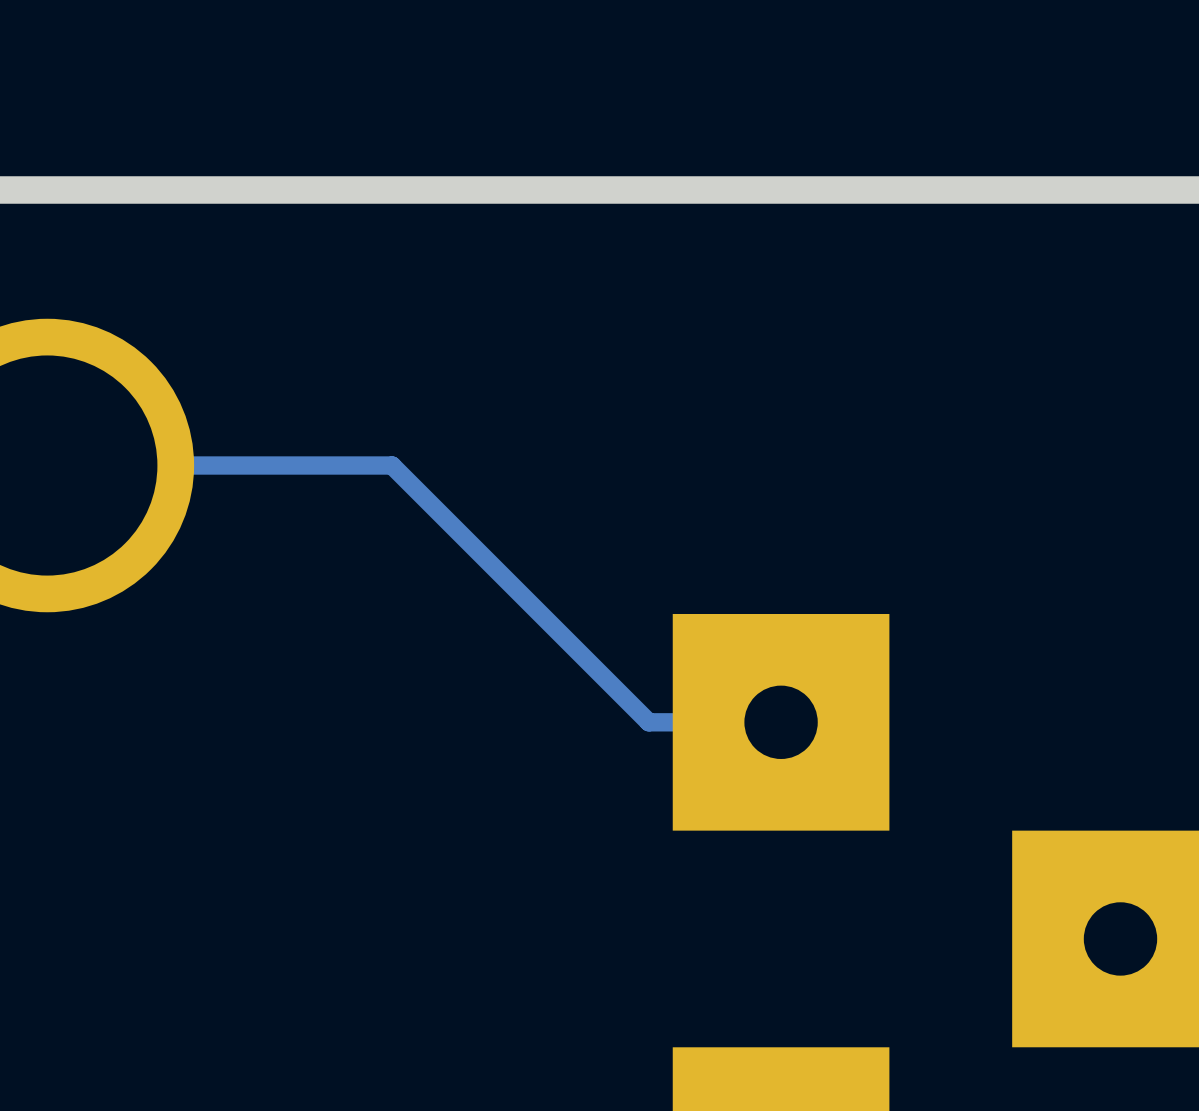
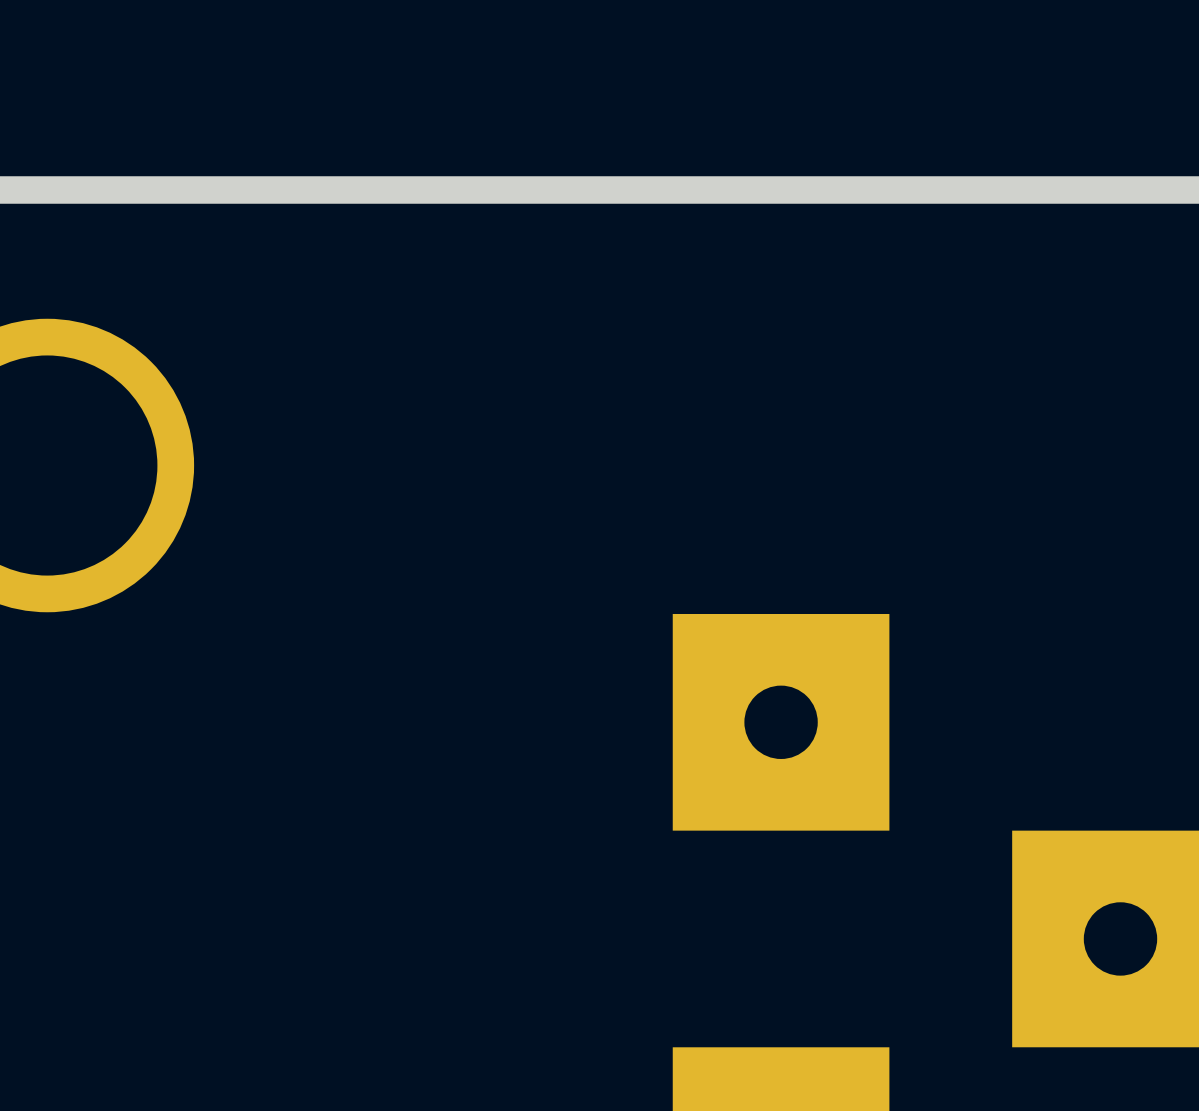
track: (47, 465) (392, 465) (648, 722) (781, 722) -> none

